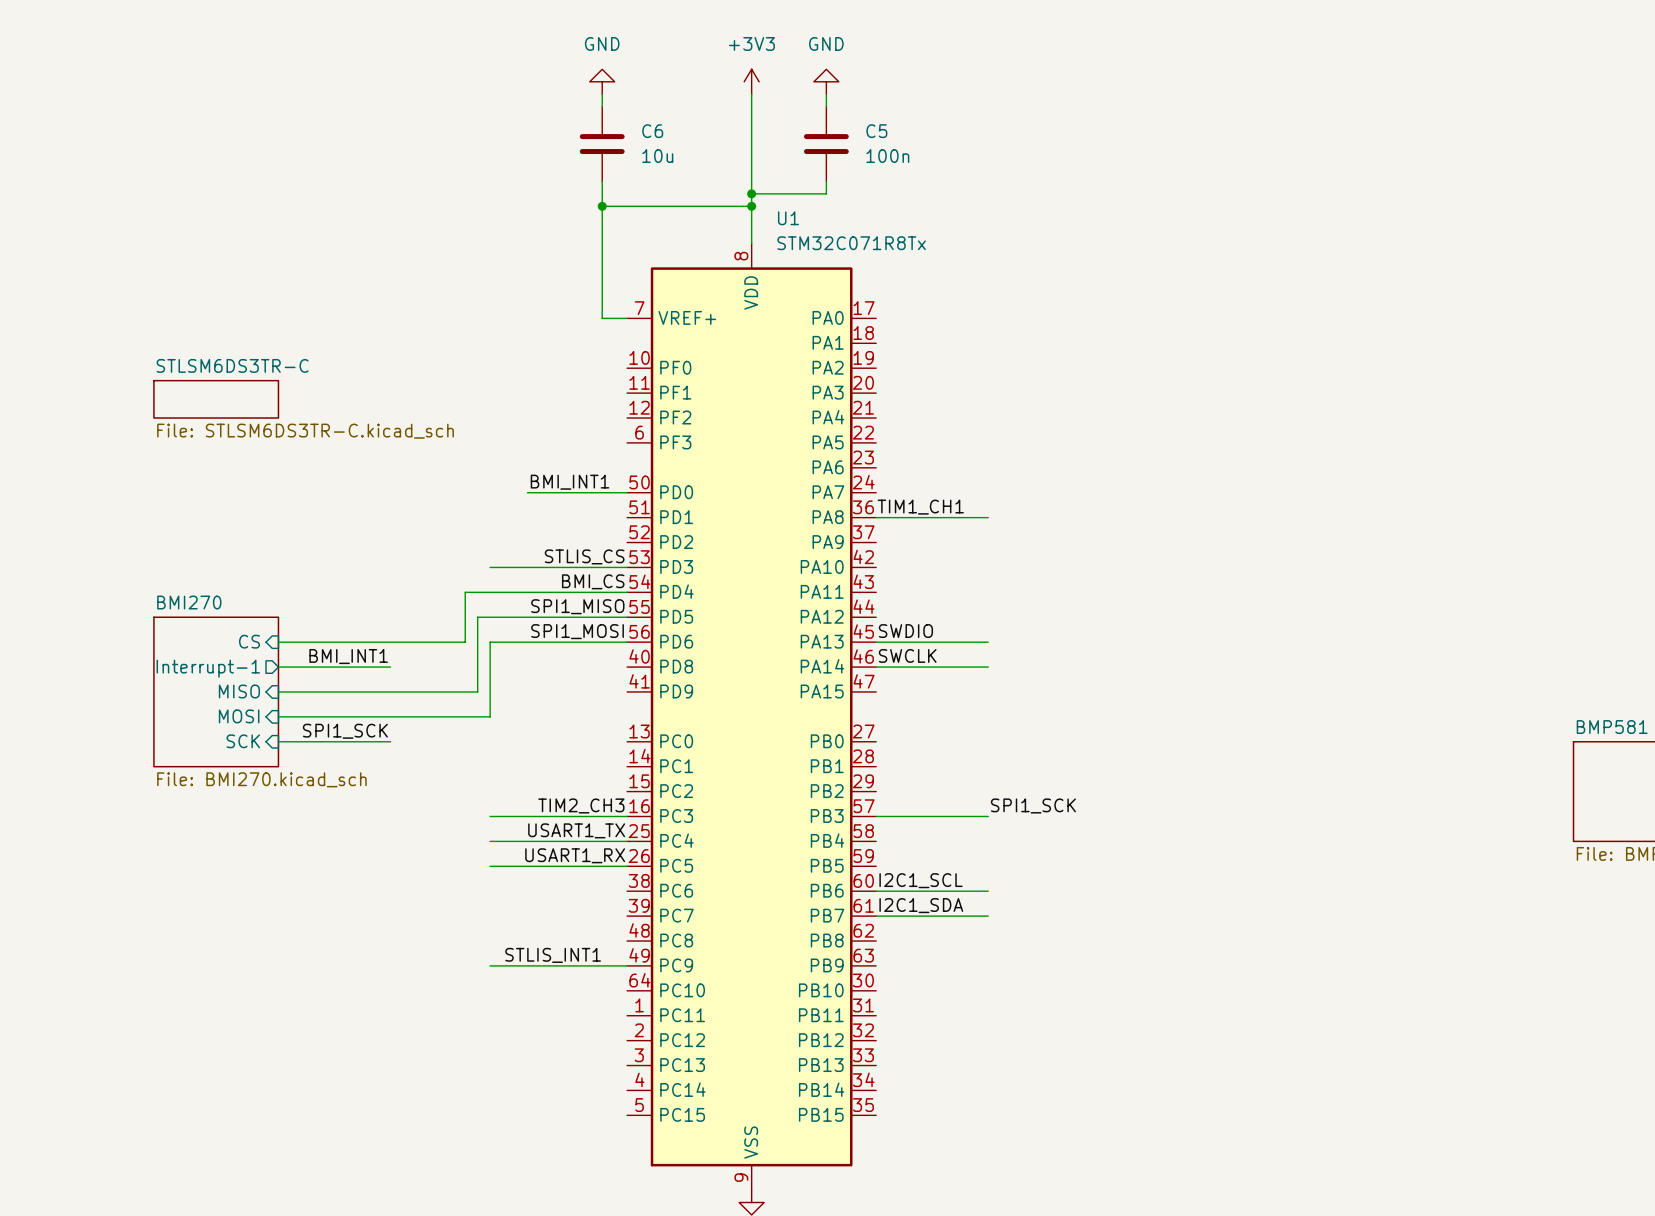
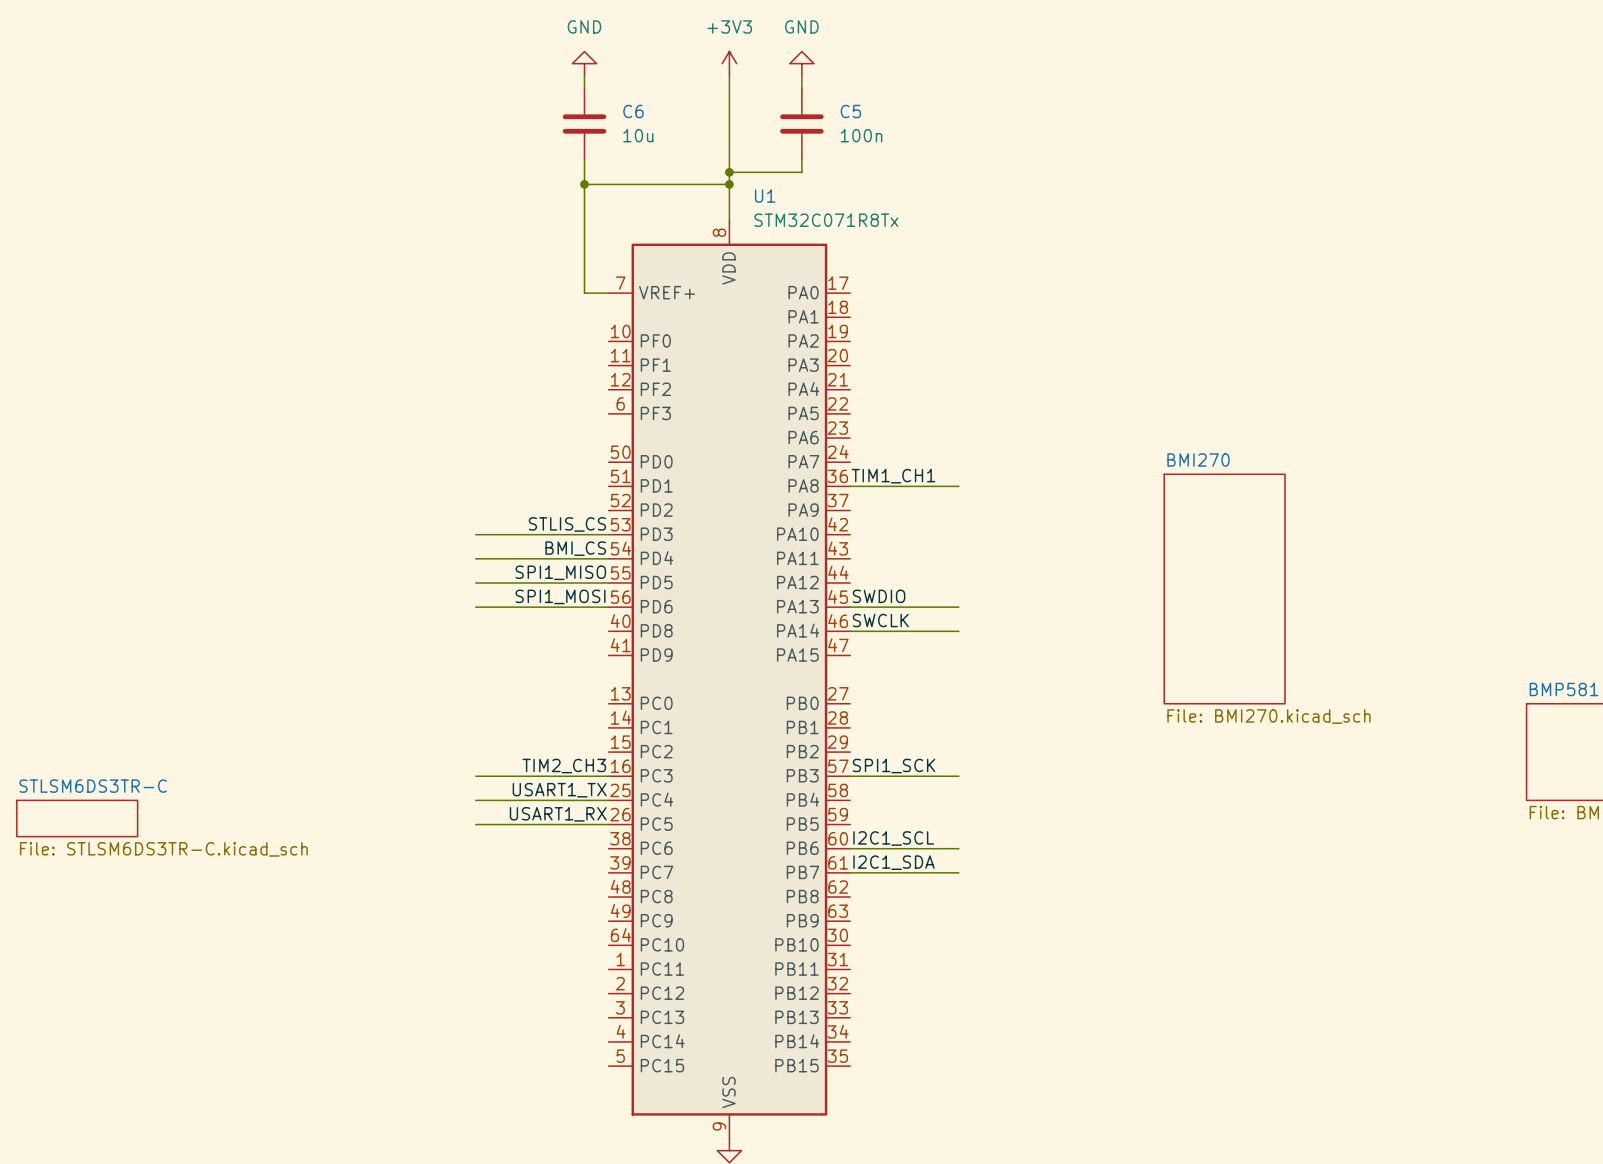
sheet STLSM6DS3TR-C position: (216, 399) -> (77, 818)
label: BMI_INT1 (570, 482) -> none
wire: (527, 492) (627, 492) -> none
wire: (490, 592) (465, 592) (465, 642) (278, 642) -> none
sheet BMI270 name position: BMI270 (189, 602) -> BMI270 (1198, 460)
sheet BMI270 shape: [153, 616, 280, 768] -> [1163, 473, 1286, 705]
wire: (490, 617) (477, 617) (477, 691) (278, 691) -> none
sheet pin: CS (249, 641) -> none
wire: (490, 642) (490, 716) (278, 716) -> none
label: BMI_INT1 (348, 656) -> none
wire: (278, 667) (390, 667) -> none
sheet pin: Interrupt-1 (208, 668) -> none
sheet pin: MISO (239, 691) -> none
sheet pin: MOSI (239, 716) -> none
label: SPI1_SCK (345, 731) -> none
sheet pin: SCK (243, 741) -> none
wire: (278, 741) (390, 741) -> none
sheet BMI270 value position: File: BMI270.kicad_sch (261, 779) -> File: BMI270.kicad_sch (1268, 716)
label position: SPI1_SCK (1033, 805) -> SPI1_SCK (894, 766)
label: STLIS_INT1 (553, 955) -> none
wire: (490, 965) (627, 965) -> none

